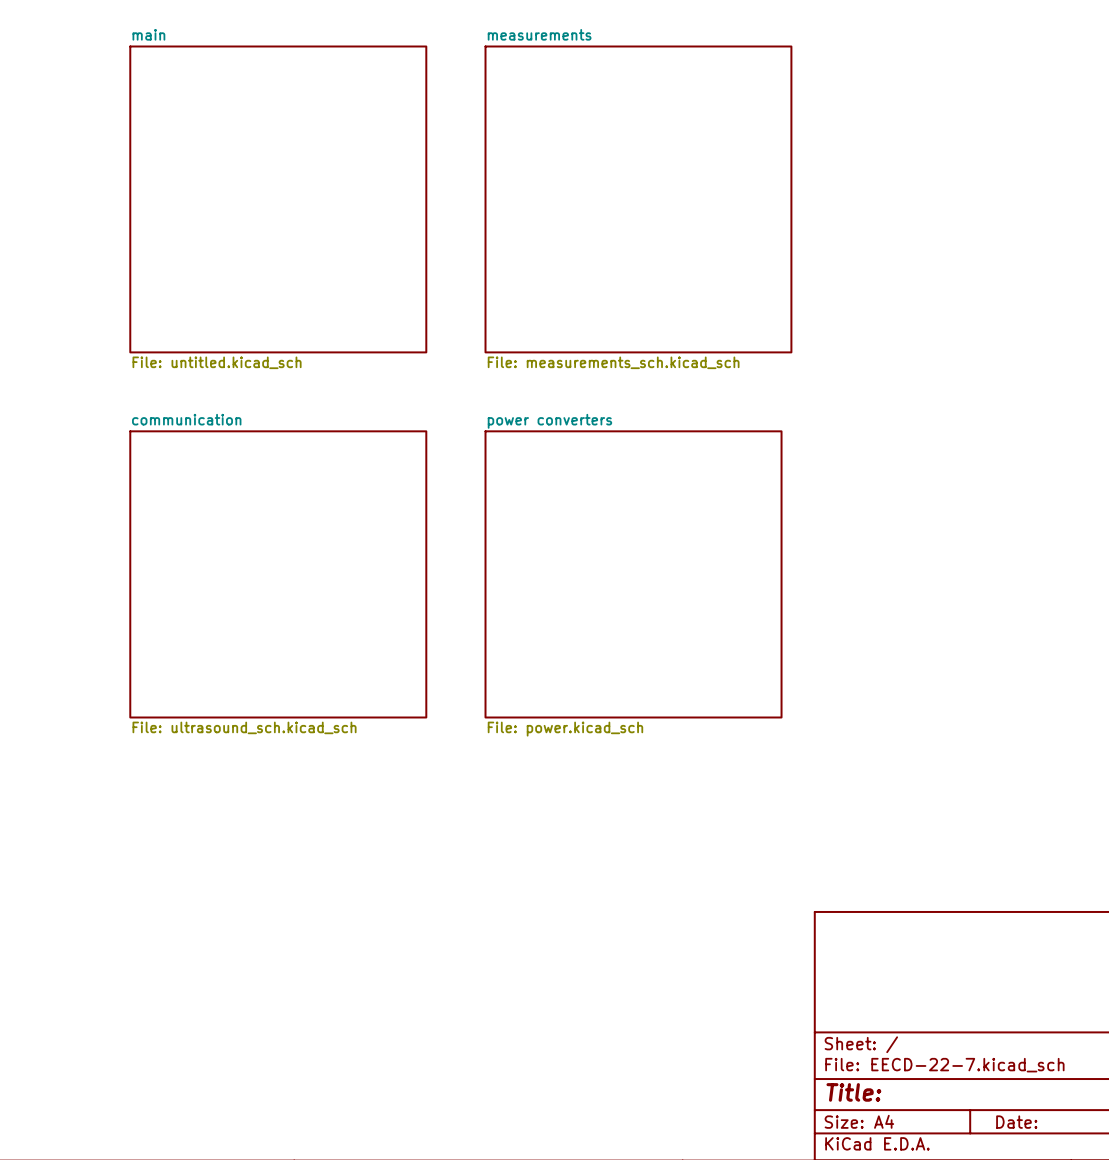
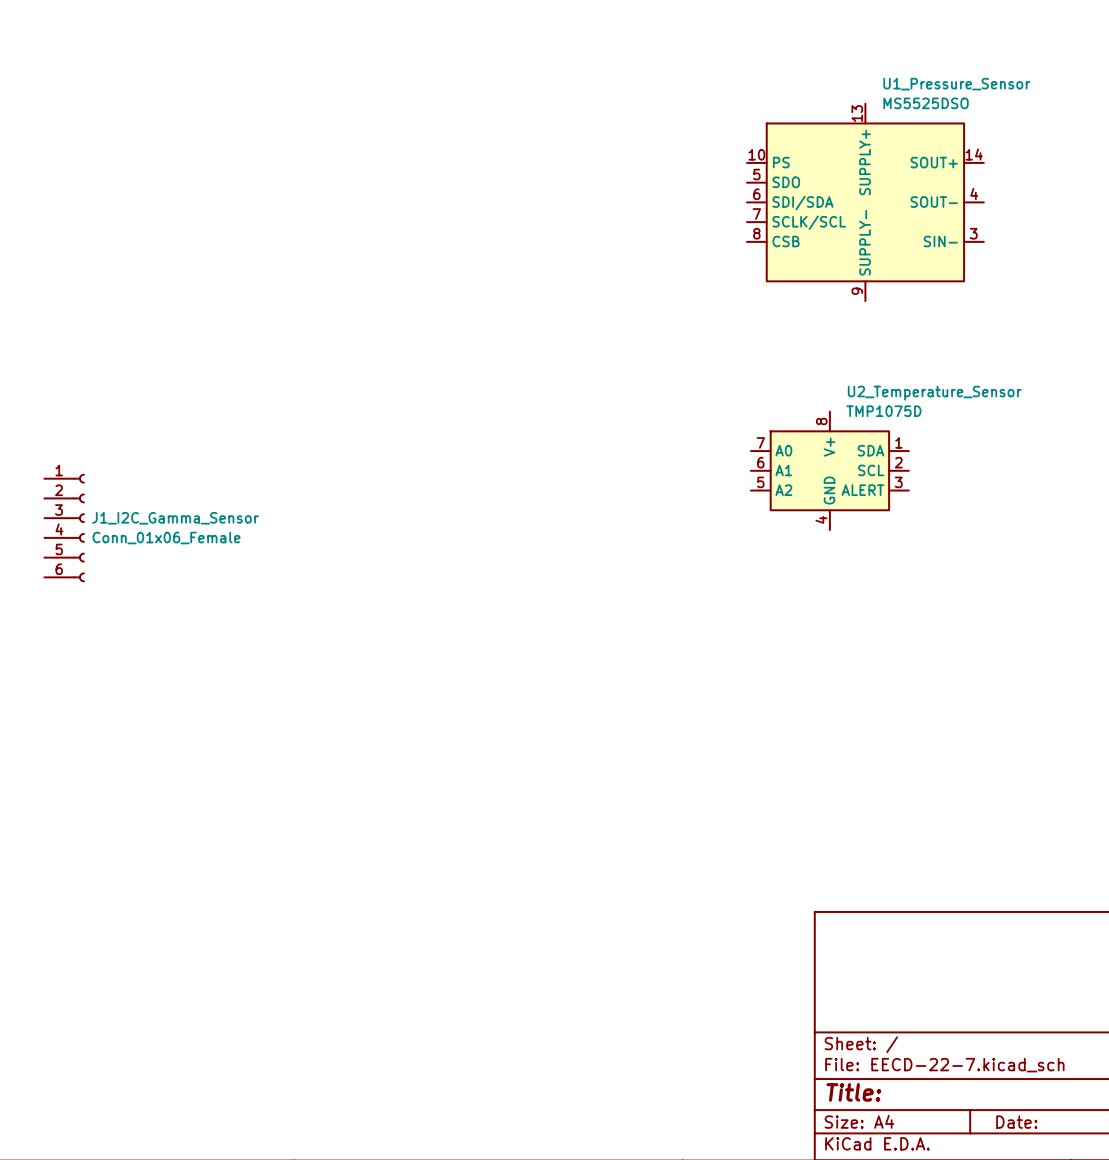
sheet main: File: untitled.kicad_sch (278, 199) -> none
sheet measurements: File: measurements_sch.kicad_sch (638, 199) -> none
U1_Pressure_Sensor: none -> MS5525DSO (865, 202)
U2_Temperature_Sensor: none -> TMP1075D (829, 470)
J1_I2C_Gamma_Sensor: none -> Conn_01x06_Female (64, 528)
sheet communication: File: ultrasound_sch.kicad_sch (278, 574) -> none
sheet power converters: File: power.kicad_sch (633, 574) -> none

